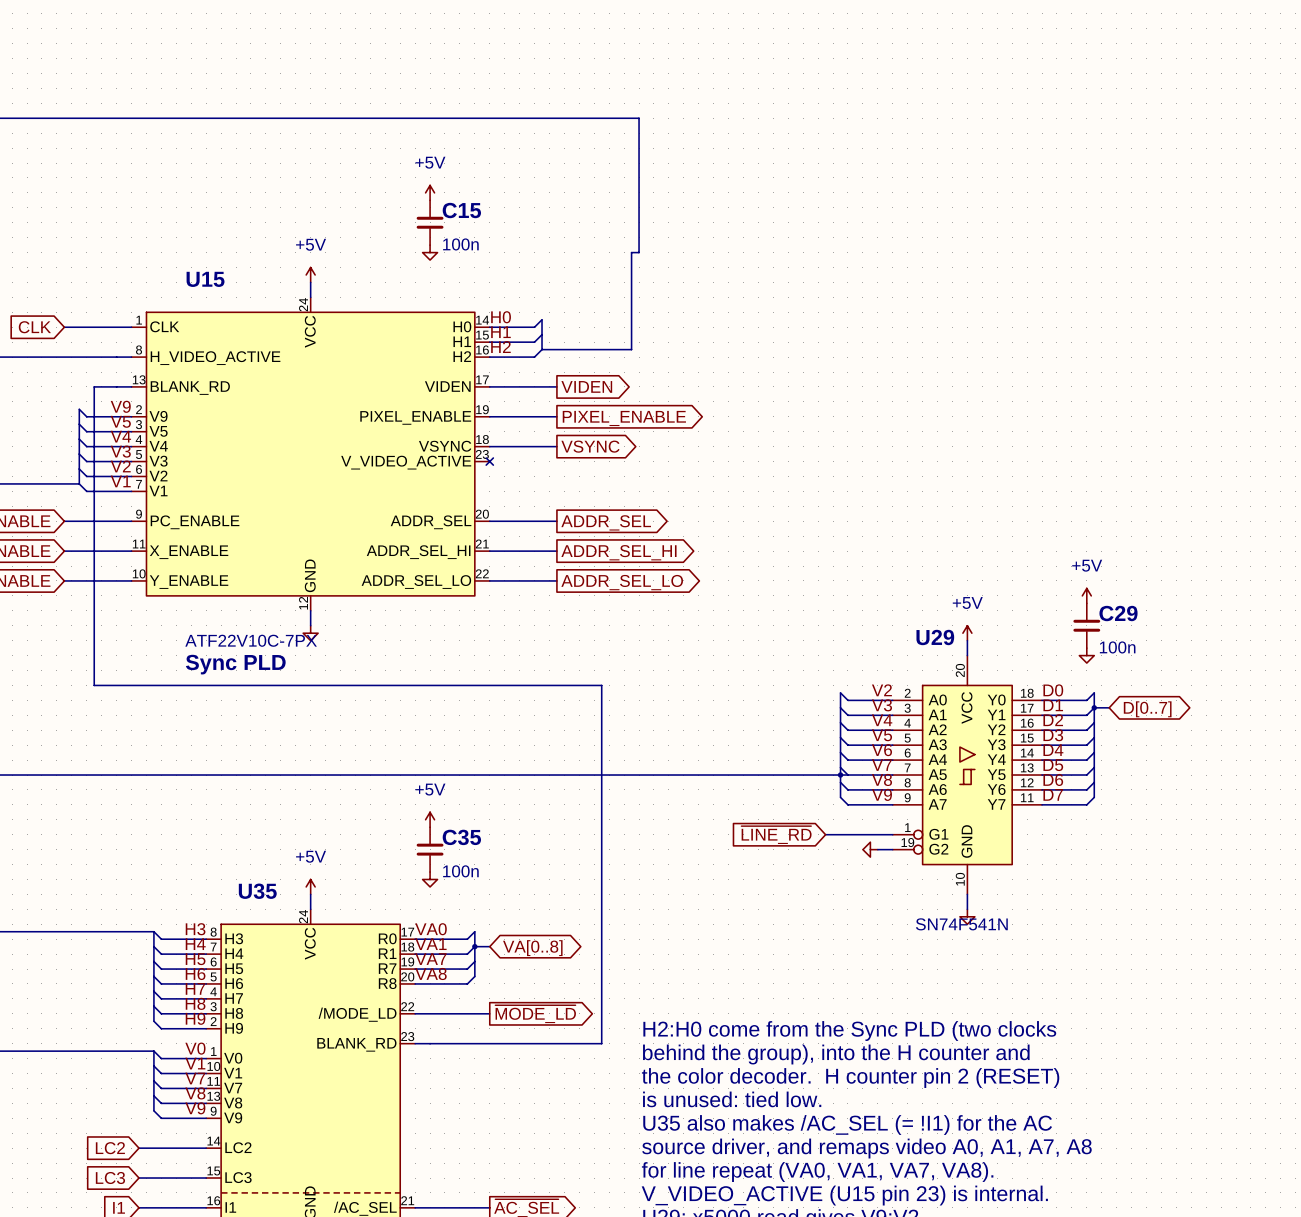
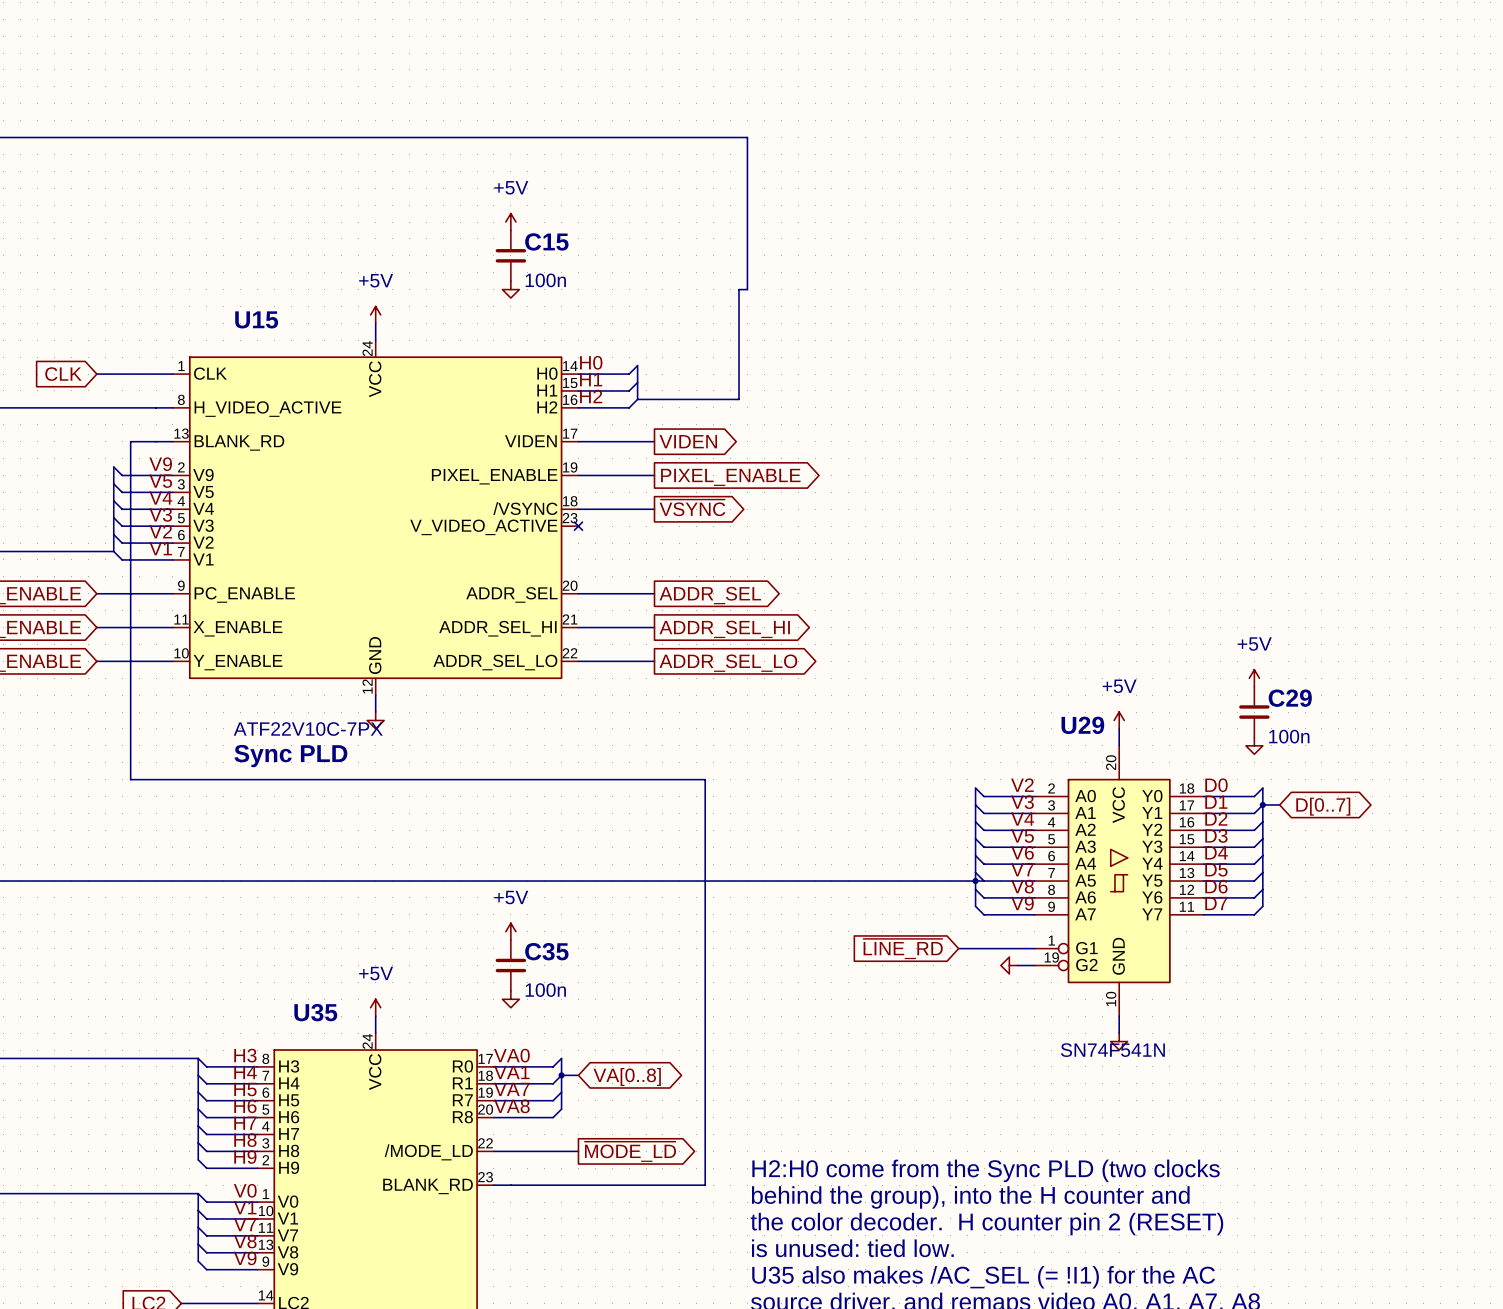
U15 pin name: VSYNC (445, 446) -> /VSYNC (525, 508)
global label: VSYNC (590, 446) -> ~{VSYNC} (692, 507)

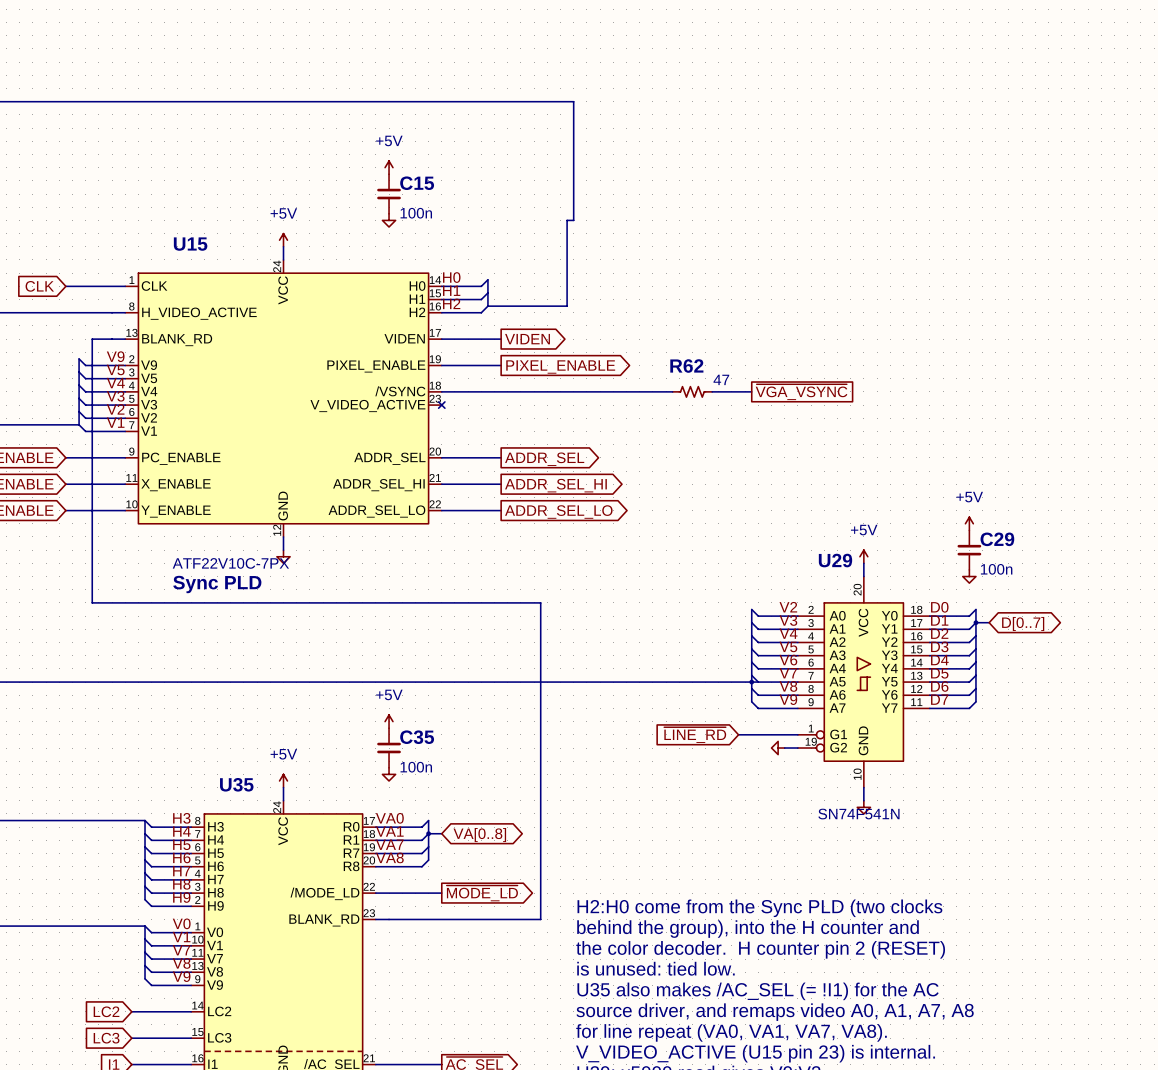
global label: ~{VSYNC} (692, 507) -> none
wire: none -> (501, 391) (672, 391)
R62: none -> 47 (692, 391)
wire: none -> (712, 391) (751, 391)
global label: none -> ~{VGA_VSYNC} (801, 392)

